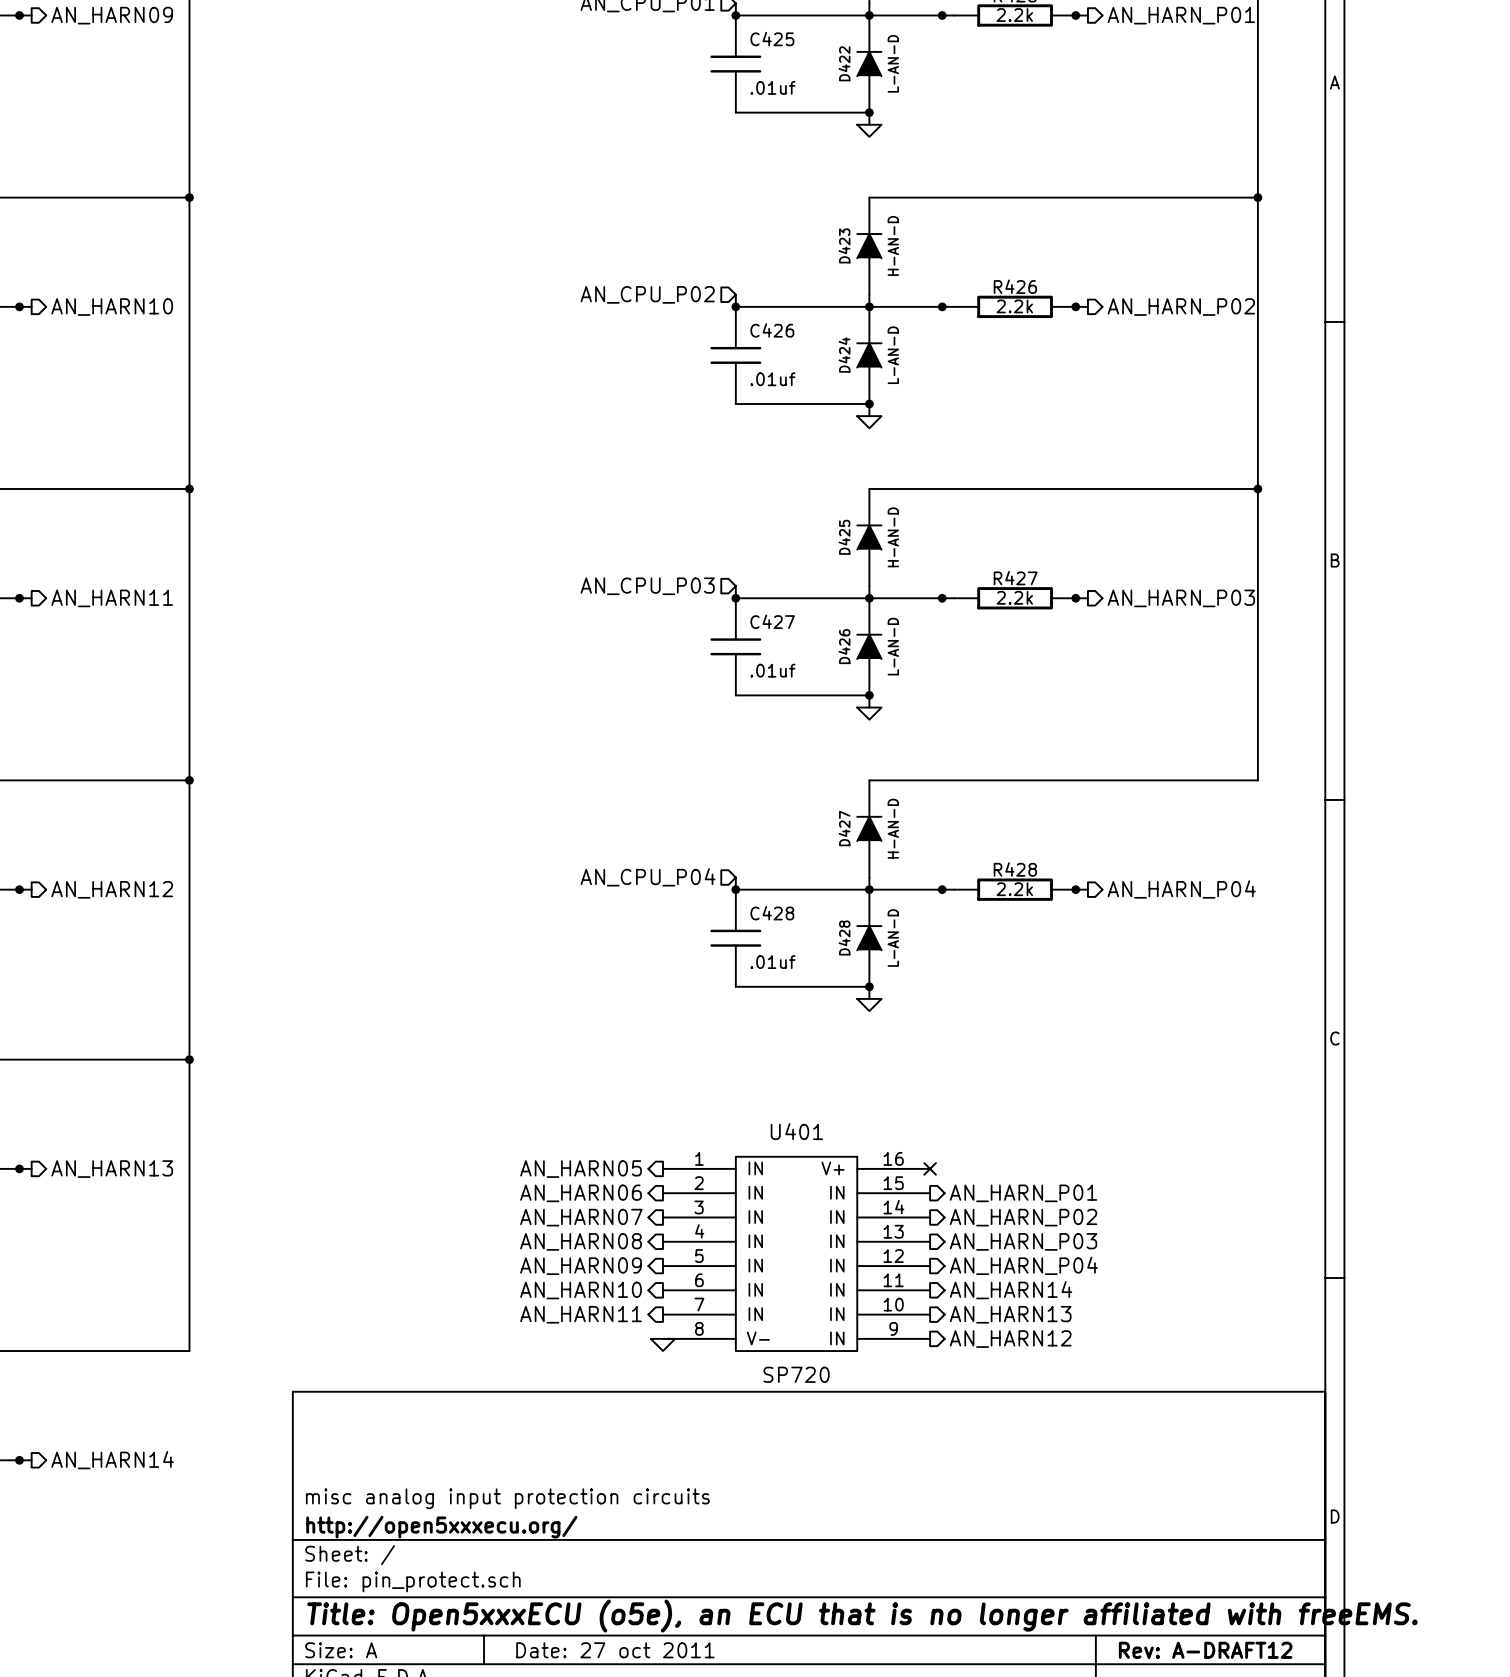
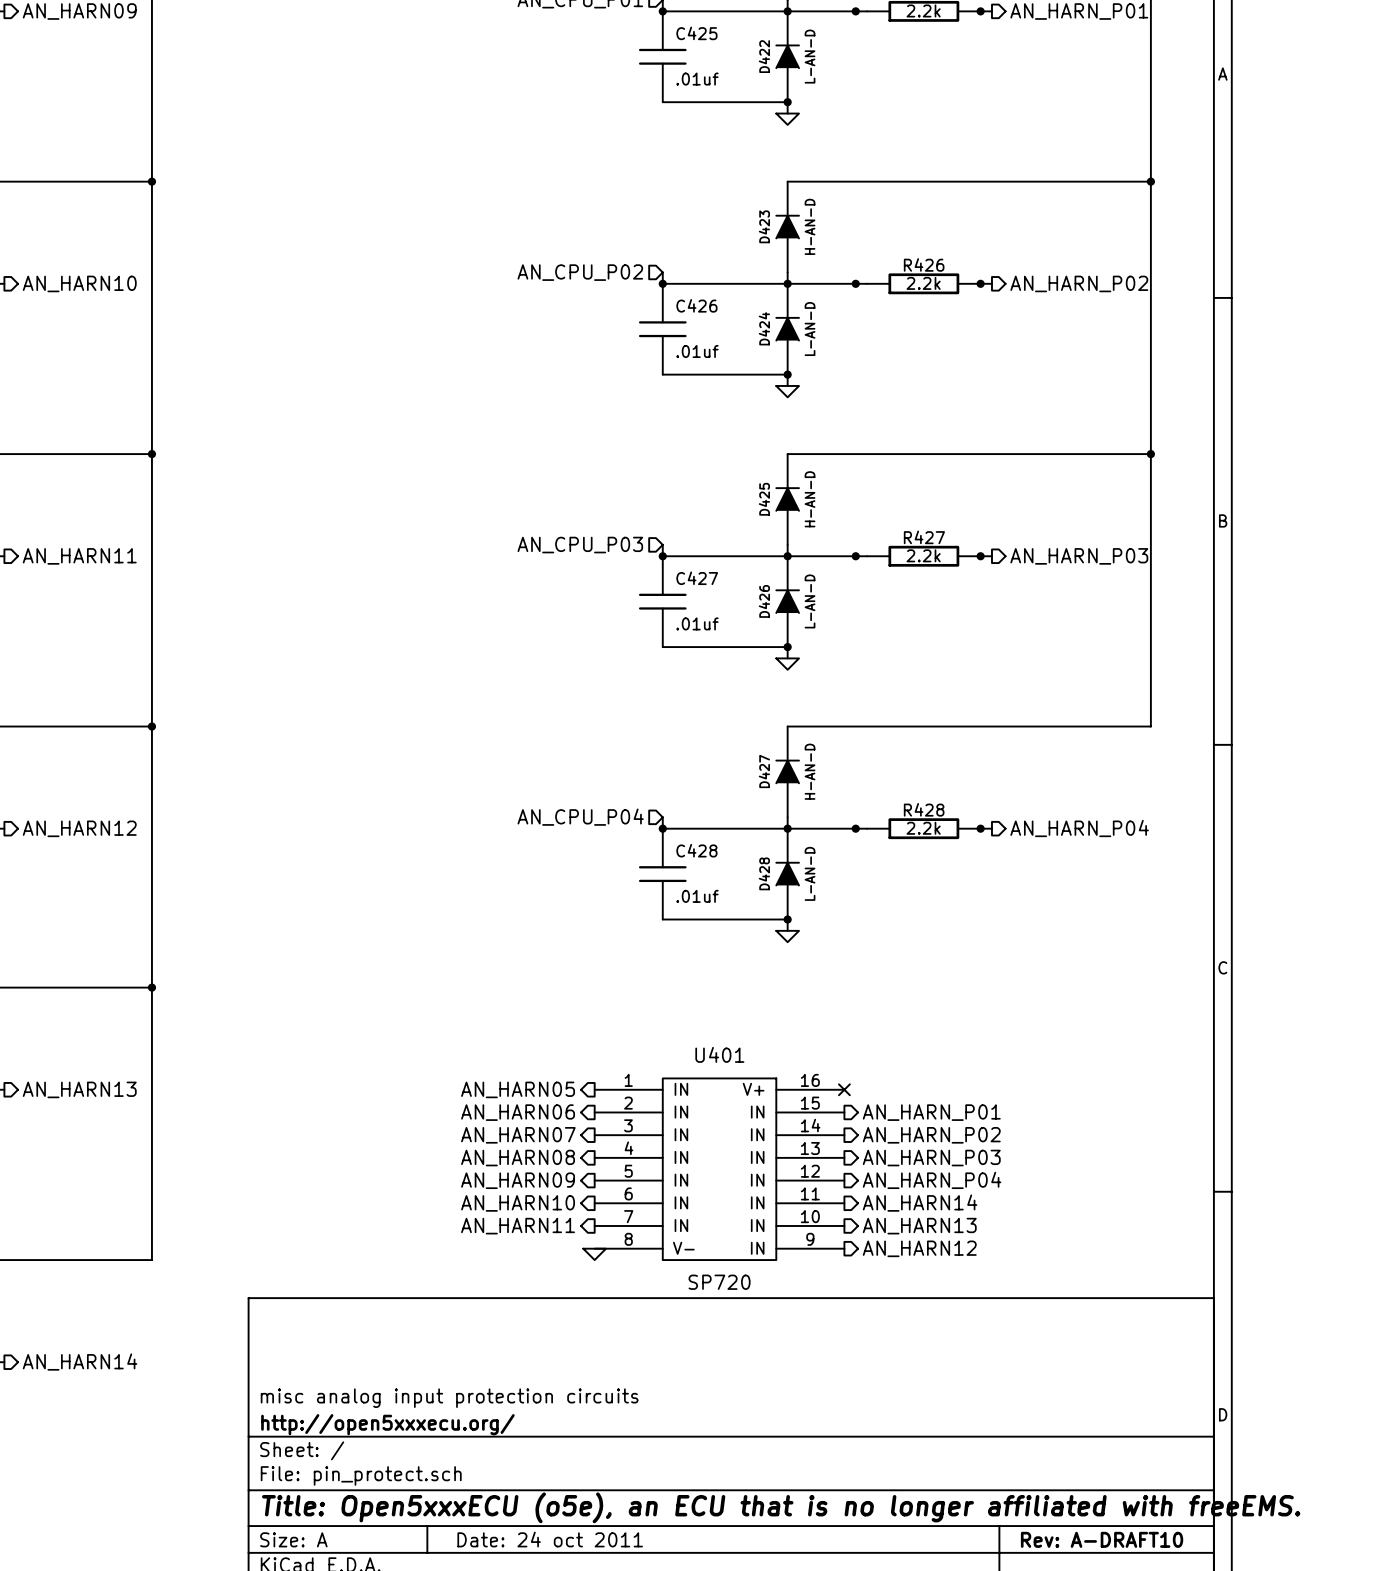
title block: Date: 27 oct 2011 (615, 1650) -> Date: 24 oct 2011 (550, 1539)
title block: Rev: A-DRAFT12 (1205, 1650) -> Rev: A-DRAFT10 (1102, 1539)

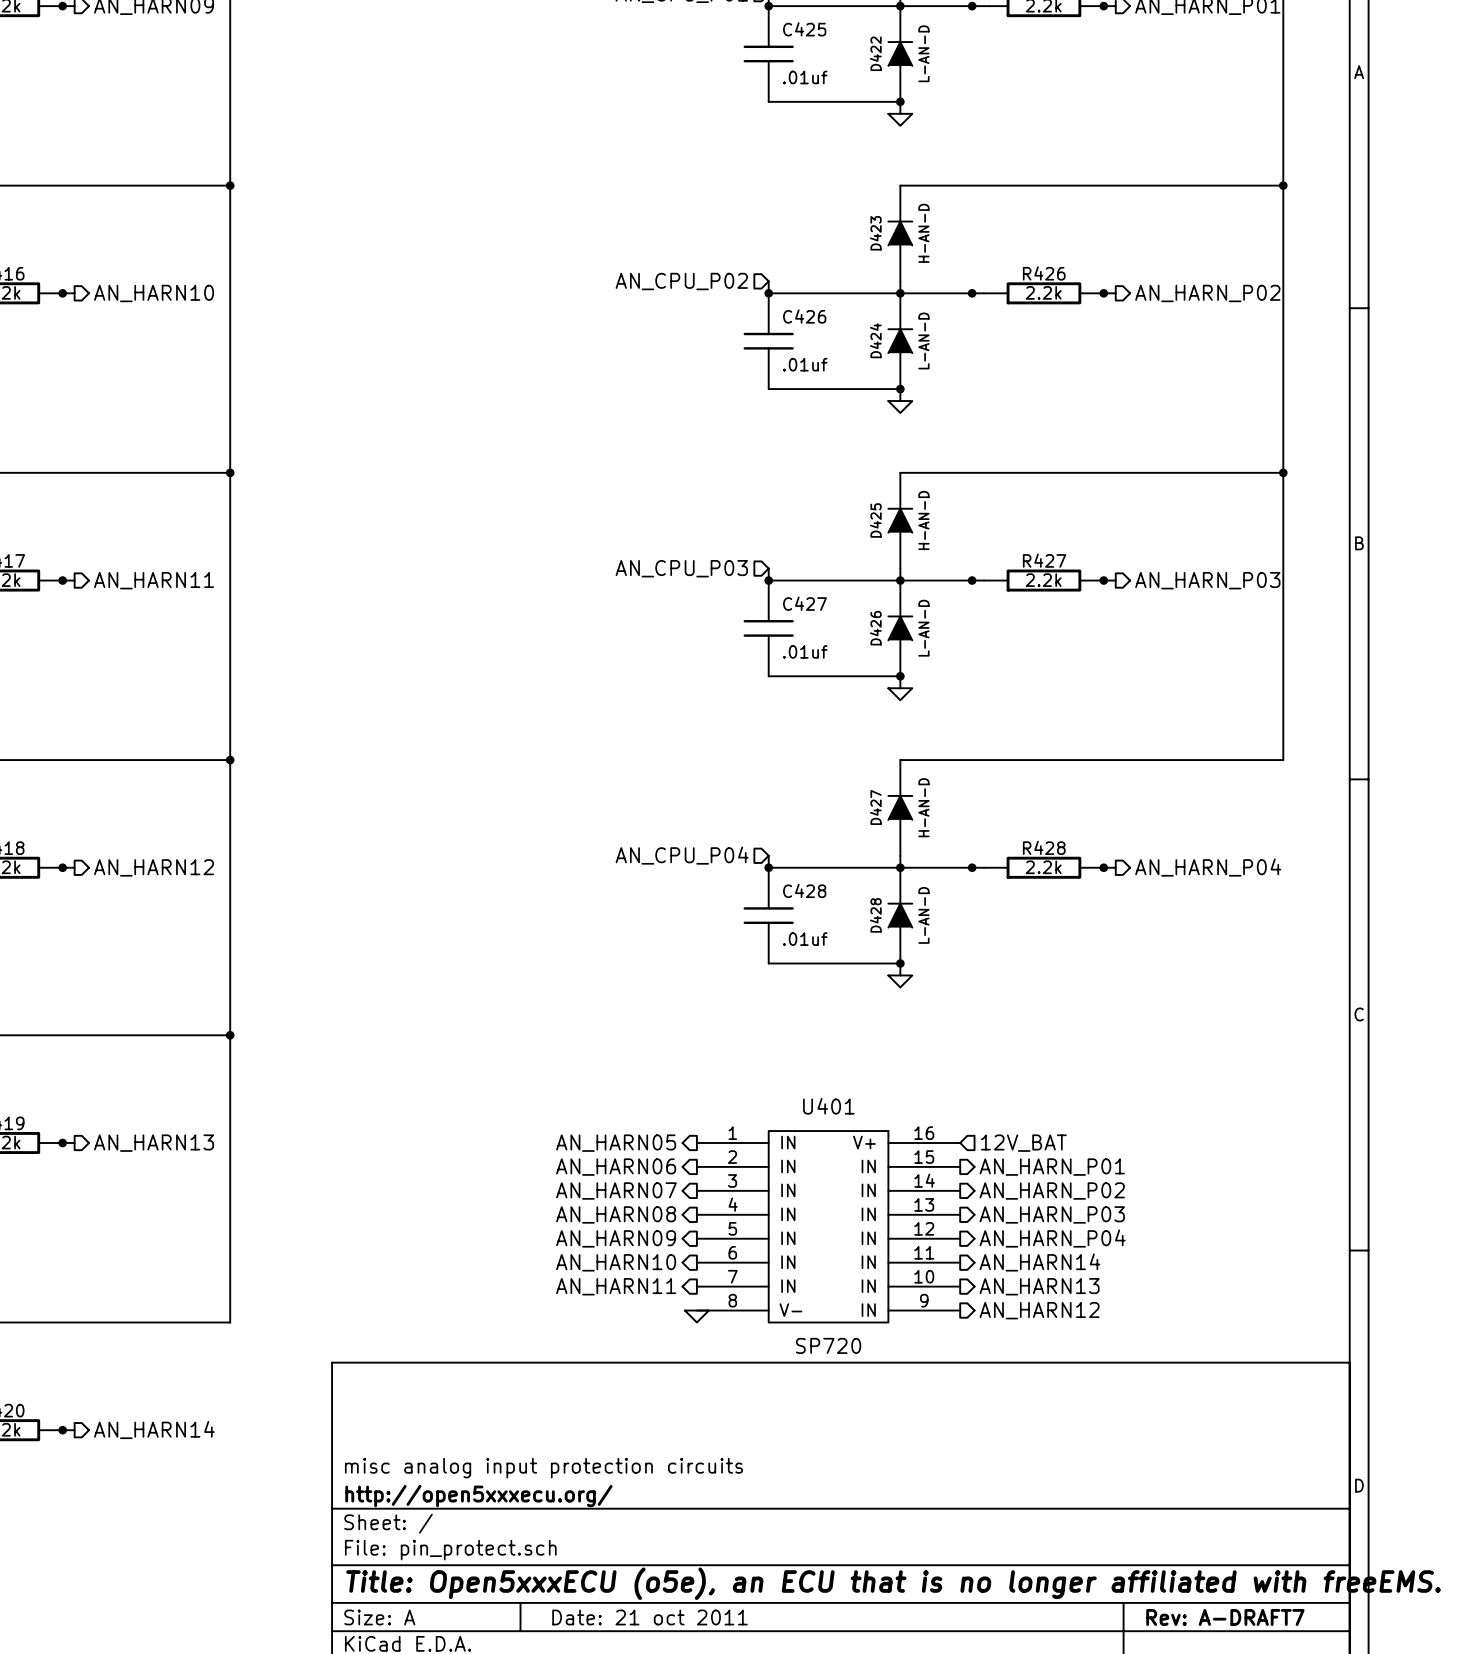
no-connect mark: (844, 1089) -> none
hierarchical label: none -> 12V_BAT (1023, 1143)
title block: Date: 24 oct 2011 (550, 1539) -> Date: 21 oct 2011 (650, 1617)
title block: Rev: A-DRAFT10 (1102, 1539) -> Rev: A-DRAFT7 (1225, 1617)

